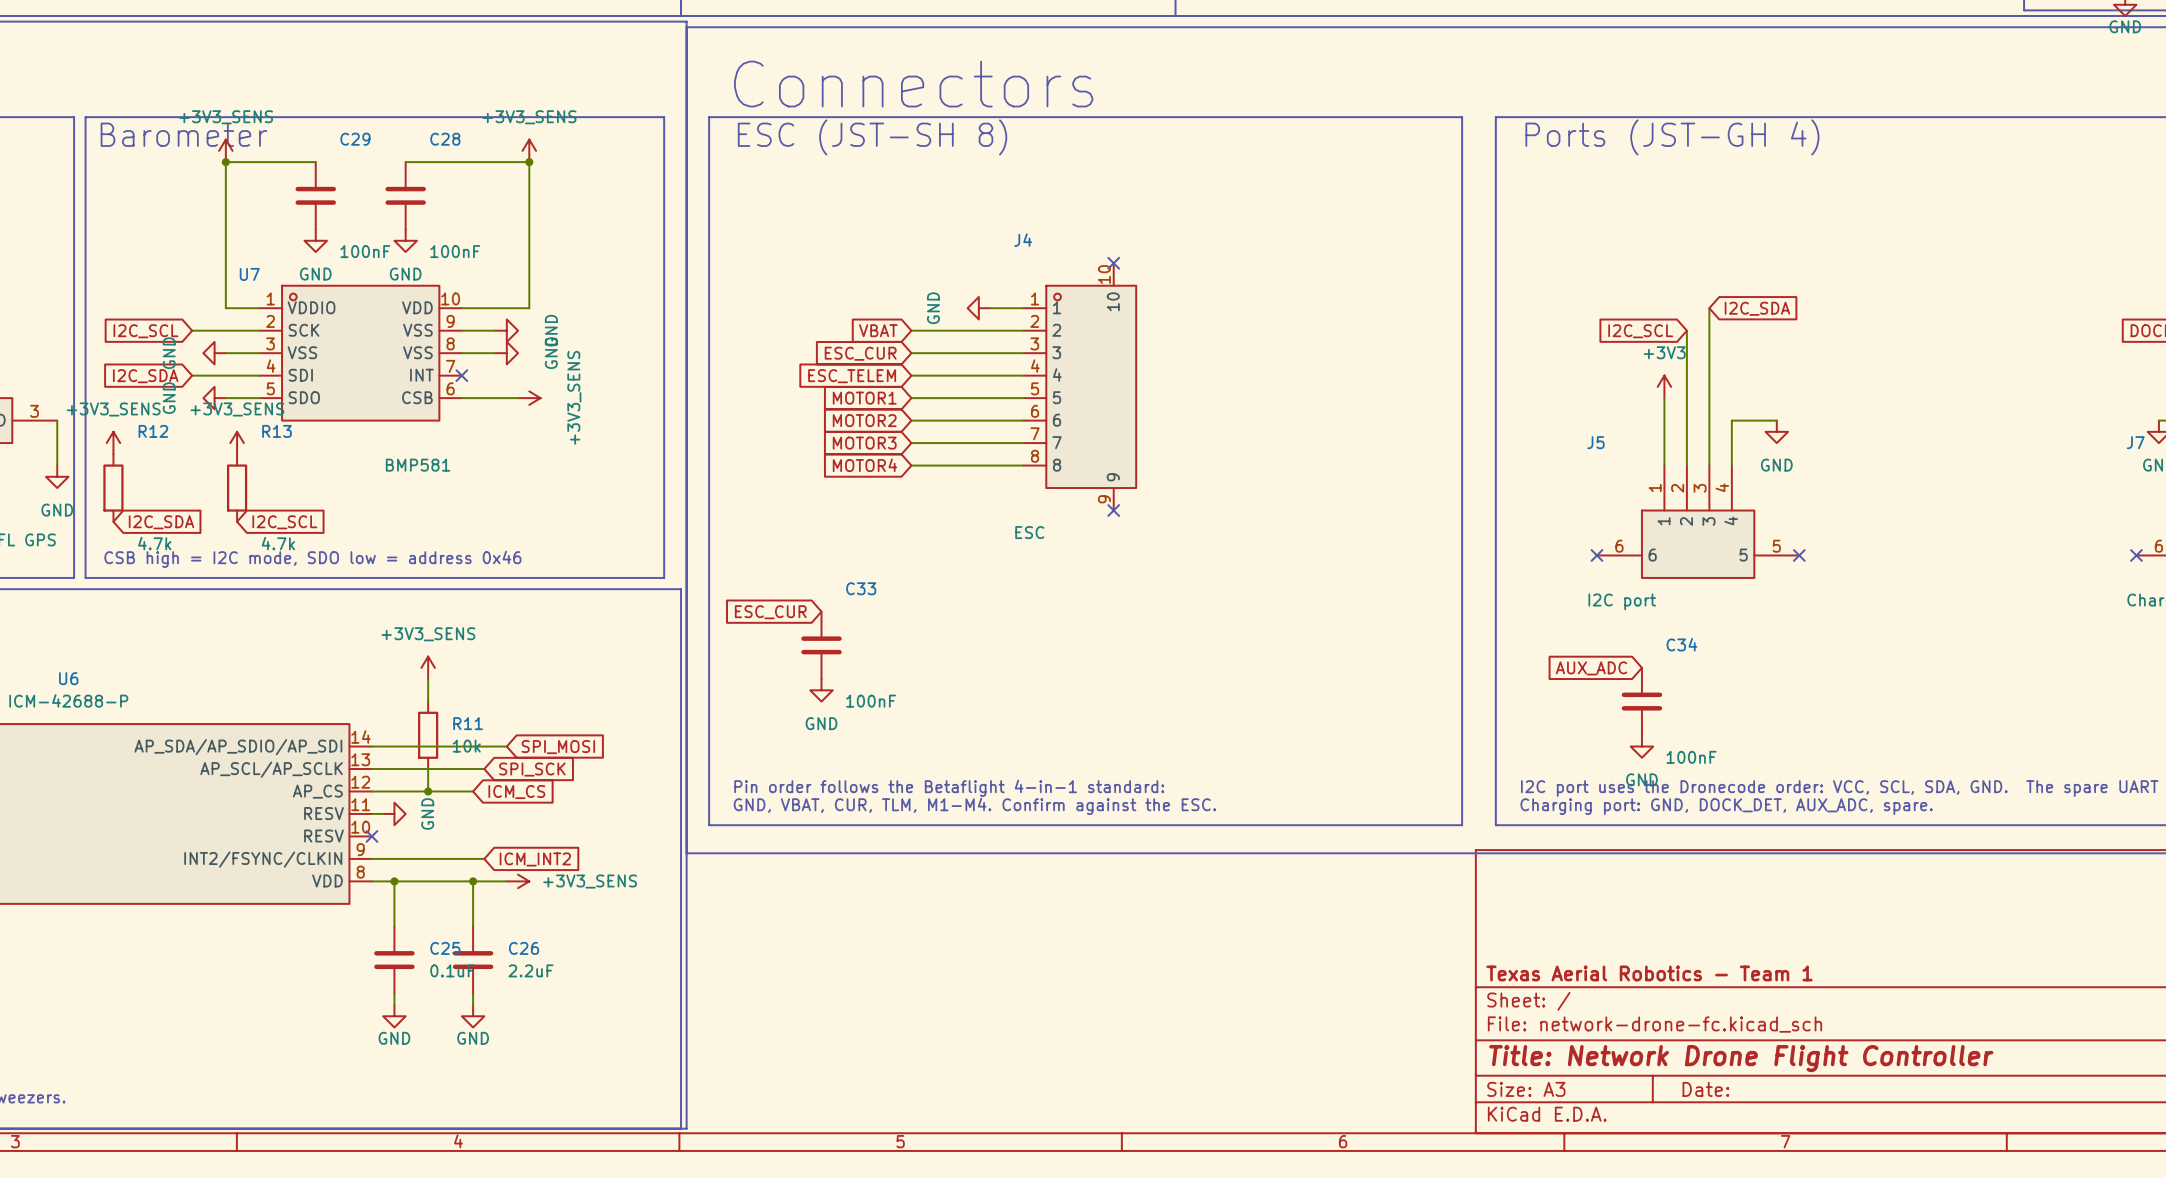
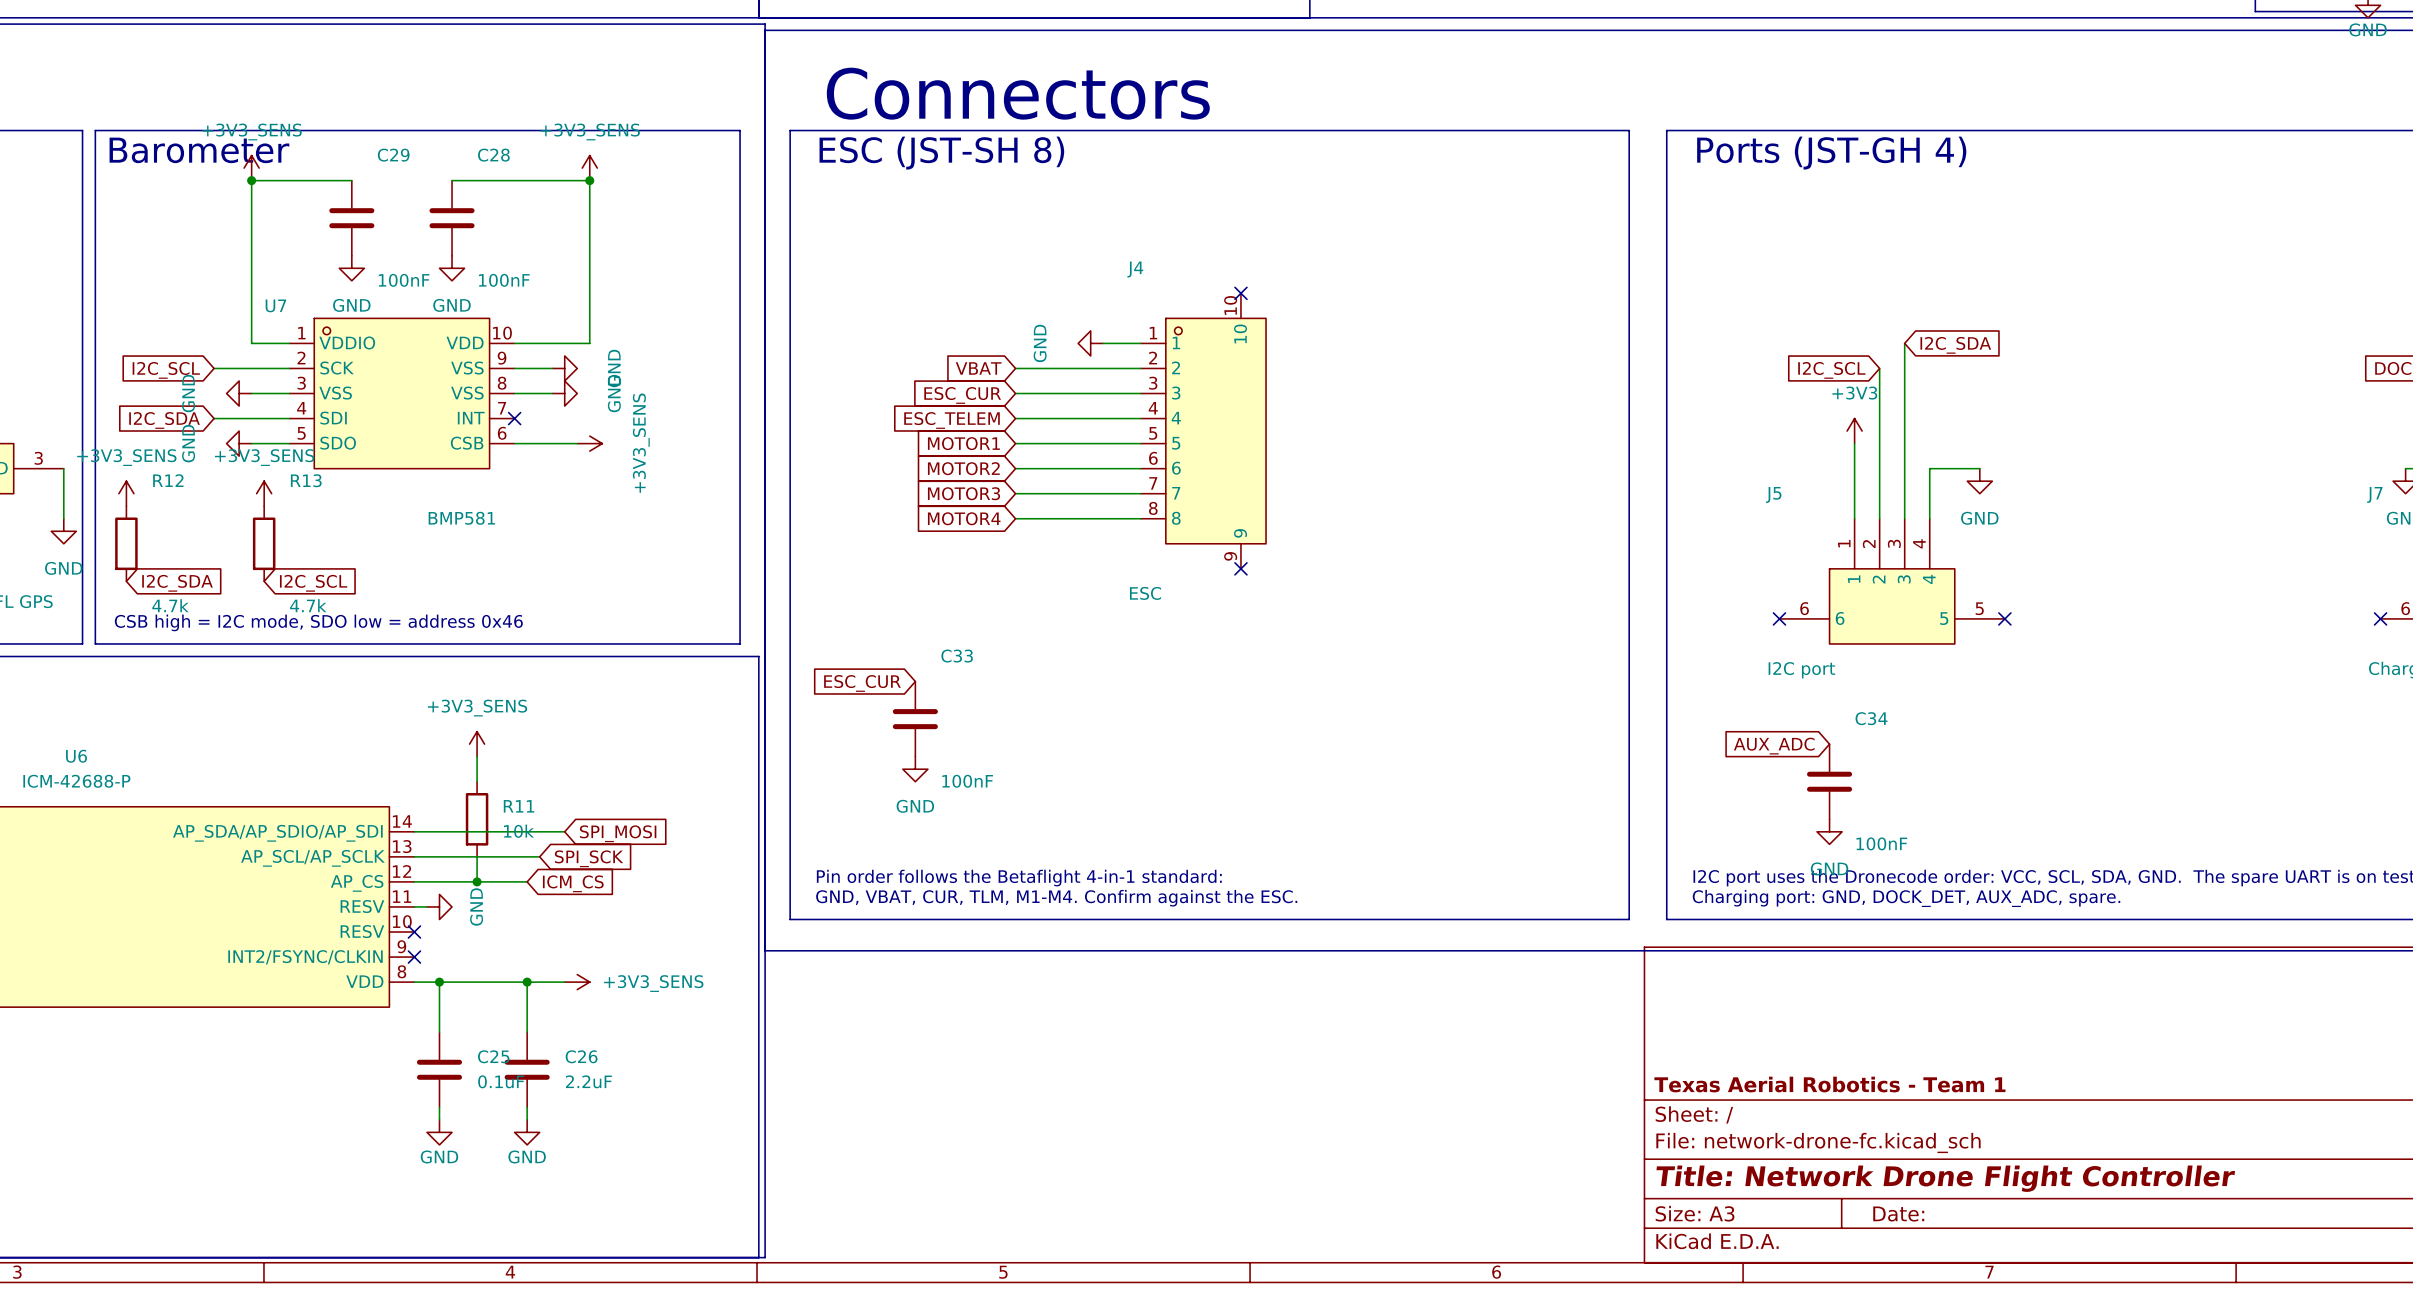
wire: (371, 858) (484, 858) -> none
no-connect mark: none -> (414, 957)
global label: ICM_INT2 (535, 859) -> none

